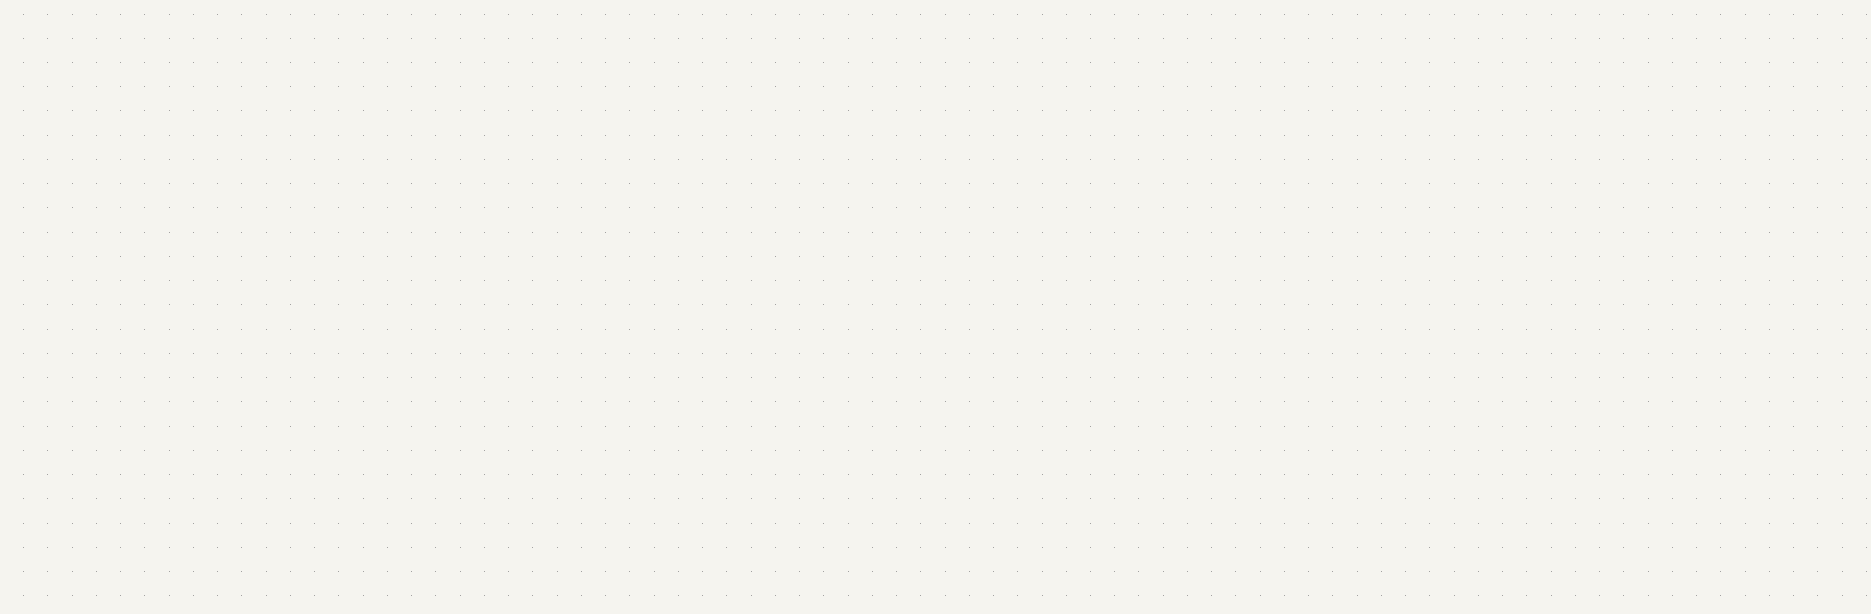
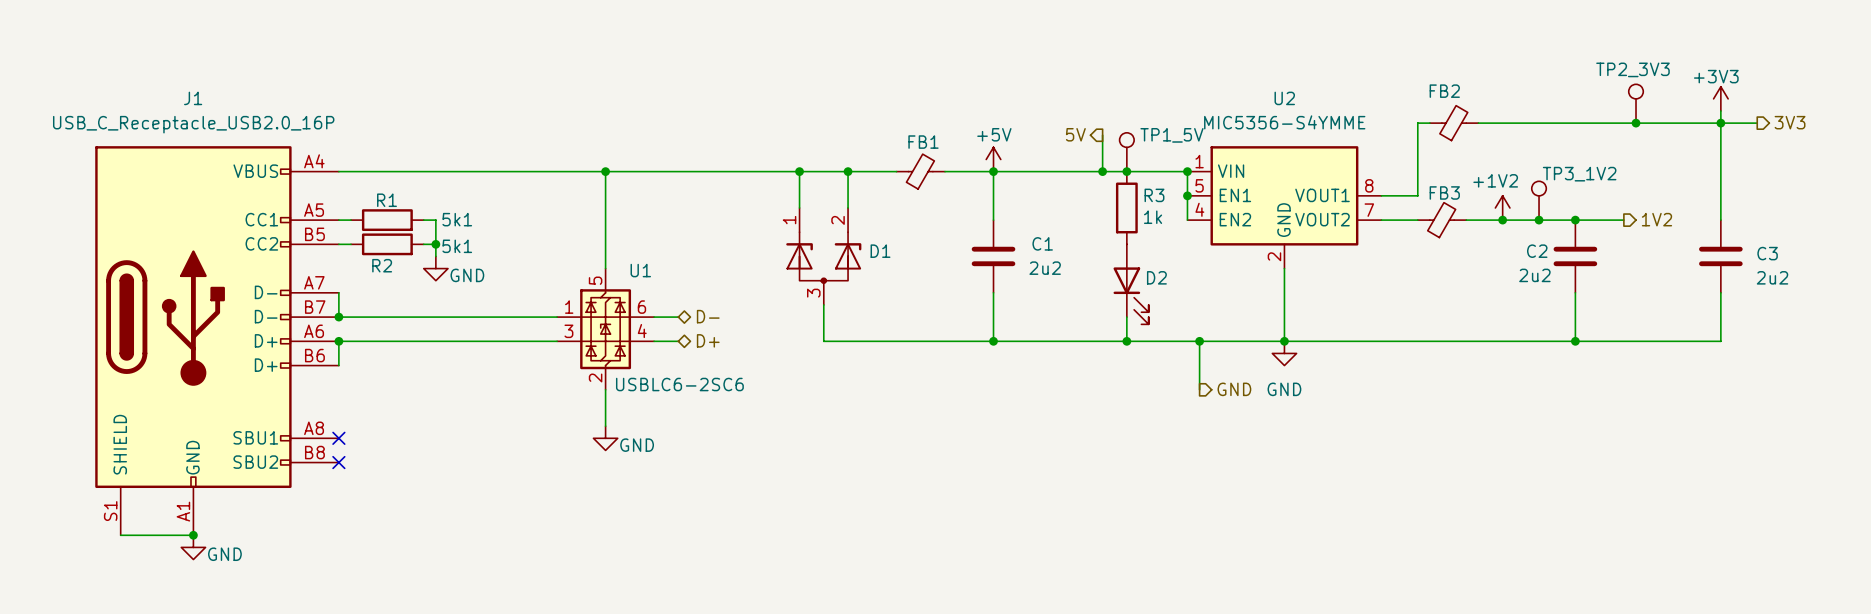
power symbol: none -> +3V3 (1720, 98)
TP2_3V3: none -> (1636, 103)
wire: none -> (1720, 110) (1720, 220)
hierarchical label: none -> 3V3 (1790, 122)
wire: none -> (1429, 123) (1417, 123) (1417, 195) (1381, 195)
FB2: none -> (1454, 123)
wire: none -> (1478, 123) (1757, 123)
junction: none -> (1636, 123)
junction: none -> (1720, 123)
hierarchical label: none -> 5V (1075, 134)
wire: none -> (1102, 135) (1102, 171)
TP1_5V: none -> (1126, 152)
power symbol: none -> +5V (993, 159)
wire: none -> (338, 171) (896, 171)
wire: none -> (605, 171) (605, 268)
junction: none -> (605, 171)
wire: none -> (799, 171) (799, 207)
junction: none -> (799, 171)
wire: none -> (848, 171) (848, 207)
junction: none -> (848, 171)
FB1: none -> (920, 171)
wire: none -> (945, 171) (1187, 171) (1187, 220)
wire: none -> (993, 171) (993, 220)
junction: none -> (993, 171)
junction: none -> (1102, 171)
junction: none -> (1126, 171)
junction: none -> (1187, 171)
junction: none -> (1187, 195)
TP3_1V2: none -> (1539, 200)
R3: none -> 1k (1126, 207)
U2: none -> MIC5356-S4YMME (1284, 207)
power symbol: none -> +1V2 (1502, 207)
hierarchical label: none -> 1V2 (1656, 219)
wire: none -> (338, 220) (351, 220)
R1: none -> 5k1 (387, 220)
wire: none -> (423, 220) (435, 220) (435, 256)
wire: none -> (1381, 220) (1417, 220)
FB3: none -> (1442, 220)
wire: none -> (1466, 220) (1623, 220)
junction: none -> (1502, 220)
junction: none -> (1539, 220)
junction: none -> (1575, 220)
wire: none -> (338, 244) (351, 244)
R2: none -> 5k1 (387, 244)
wire: none -> (423, 244) (435, 244)
junction: none -> (435, 244)
D1: none -> (823, 256)
C1: none -> 2u2 (993, 256)
C2: none -> 2u2 (1575, 256)
C3: none -> 2u2 (1720, 256)
power symbol: none -> GND (435, 268)
wire: none -> (1284, 268) (1284, 341)
D2: none -> (1131, 284)
wire: none -> (338, 292) (338, 317) (557, 317)
wire: none -> (993, 292) (993, 341)
wire: none -> (1575, 292) (1575, 341)
wire: none -> (1720, 292) (1720, 341) (823, 341) (823, 304)
hierarchical label: none -> D- (708, 316)
junction: none -> (338, 317)
wire: none -> (654, 317) (678, 317)
wire: none -> (1126, 317) (1126, 341)
U1: none -> USBLC6-2SC6 (605, 329)
J1: none -> USB_C_Receptacle_USB2.0_16P (217, 340)
hierarchical label: none -> D+ (708, 340)
junction: none -> (338, 341)
wire: none -> (557, 341) (338, 341) (338, 365)
wire: none -> (654, 341) (678, 341)
junction: none -> (993, 341)
junction: none -> (1126, 341)
wire: none -> (1199, 341) (1199, 389)
junction: none -> (1199, 341)
junction: none -> (1284, 341)
junction: none -> (1575, 341)
power symbol: none -> GND (1284, 353)
wire: none -> (605, 389) (605, 426)
hierarchical label: none -> GND (1234, 389)
no-connect mark: none -> (338, 438)
power symbol: none -> GND (605, 438)
no-connect mark: none -> (338, 462)
wire: none -> (120, 535) (193, 535)
junction: none -> (193, 535)
power symbol: none -> GND (193, 547)

